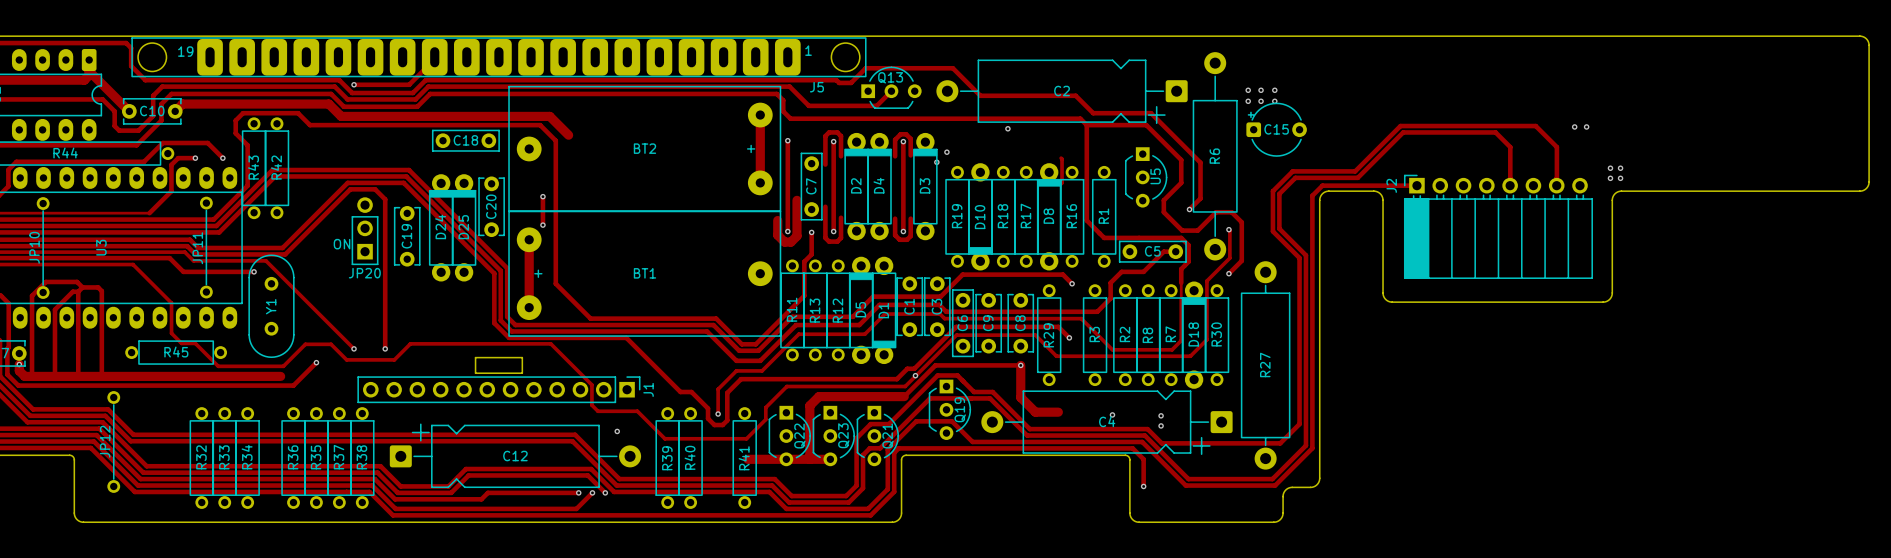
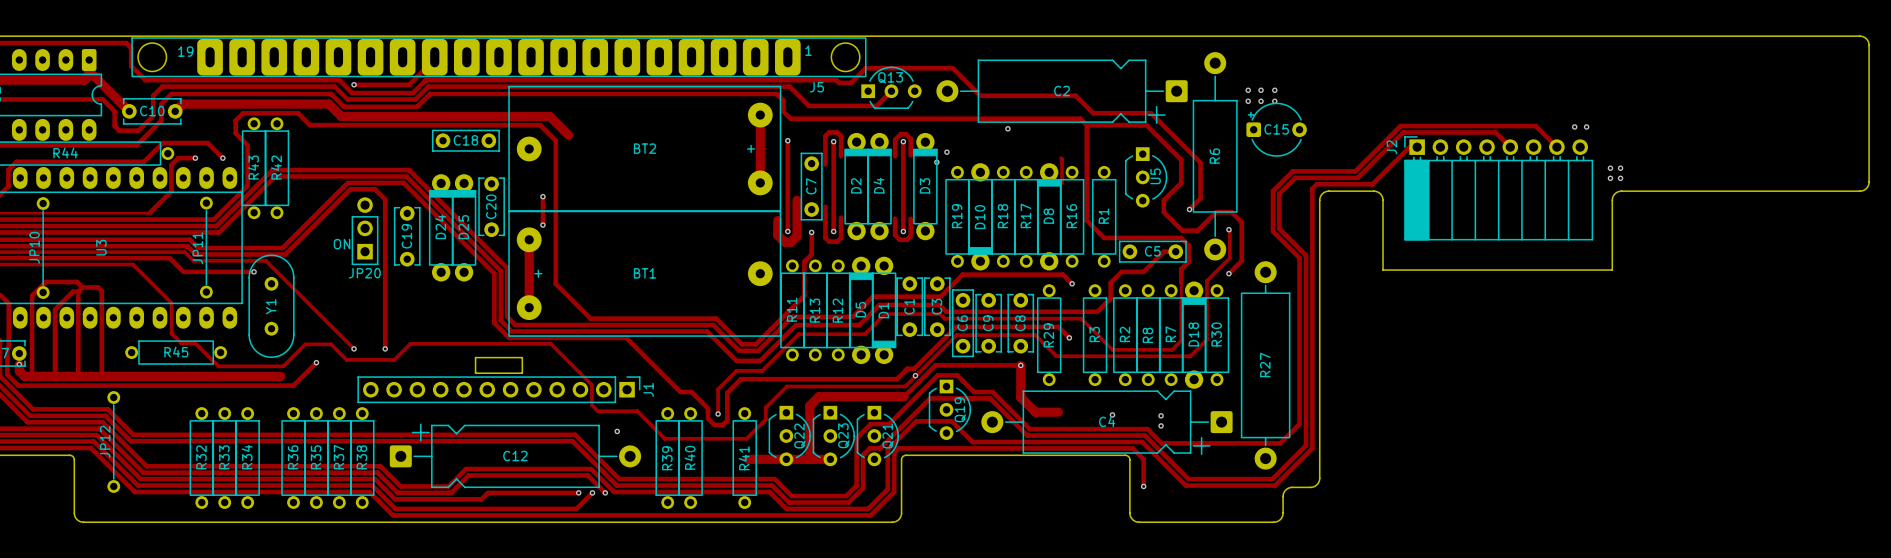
track: (1510, 147) (1510, 185) -> none
track: (1556, 147) (1556, 185) -> none
track: (1416, 185) (1322, 185) (1312, 195) -> (1417, 147) (1409, 147) (1372, 184) (1316, 184) (1312, 188) (1312, 195)
J2 position: (1498, 226) -> (1498, 188)
board edge: (1383, 270) (1383, 295) (1386, 300) (1392, 302) (1604, 302) (1608, 300) (1612, 295) (1612, 270) -> (1383, 270) (1612, 270)

